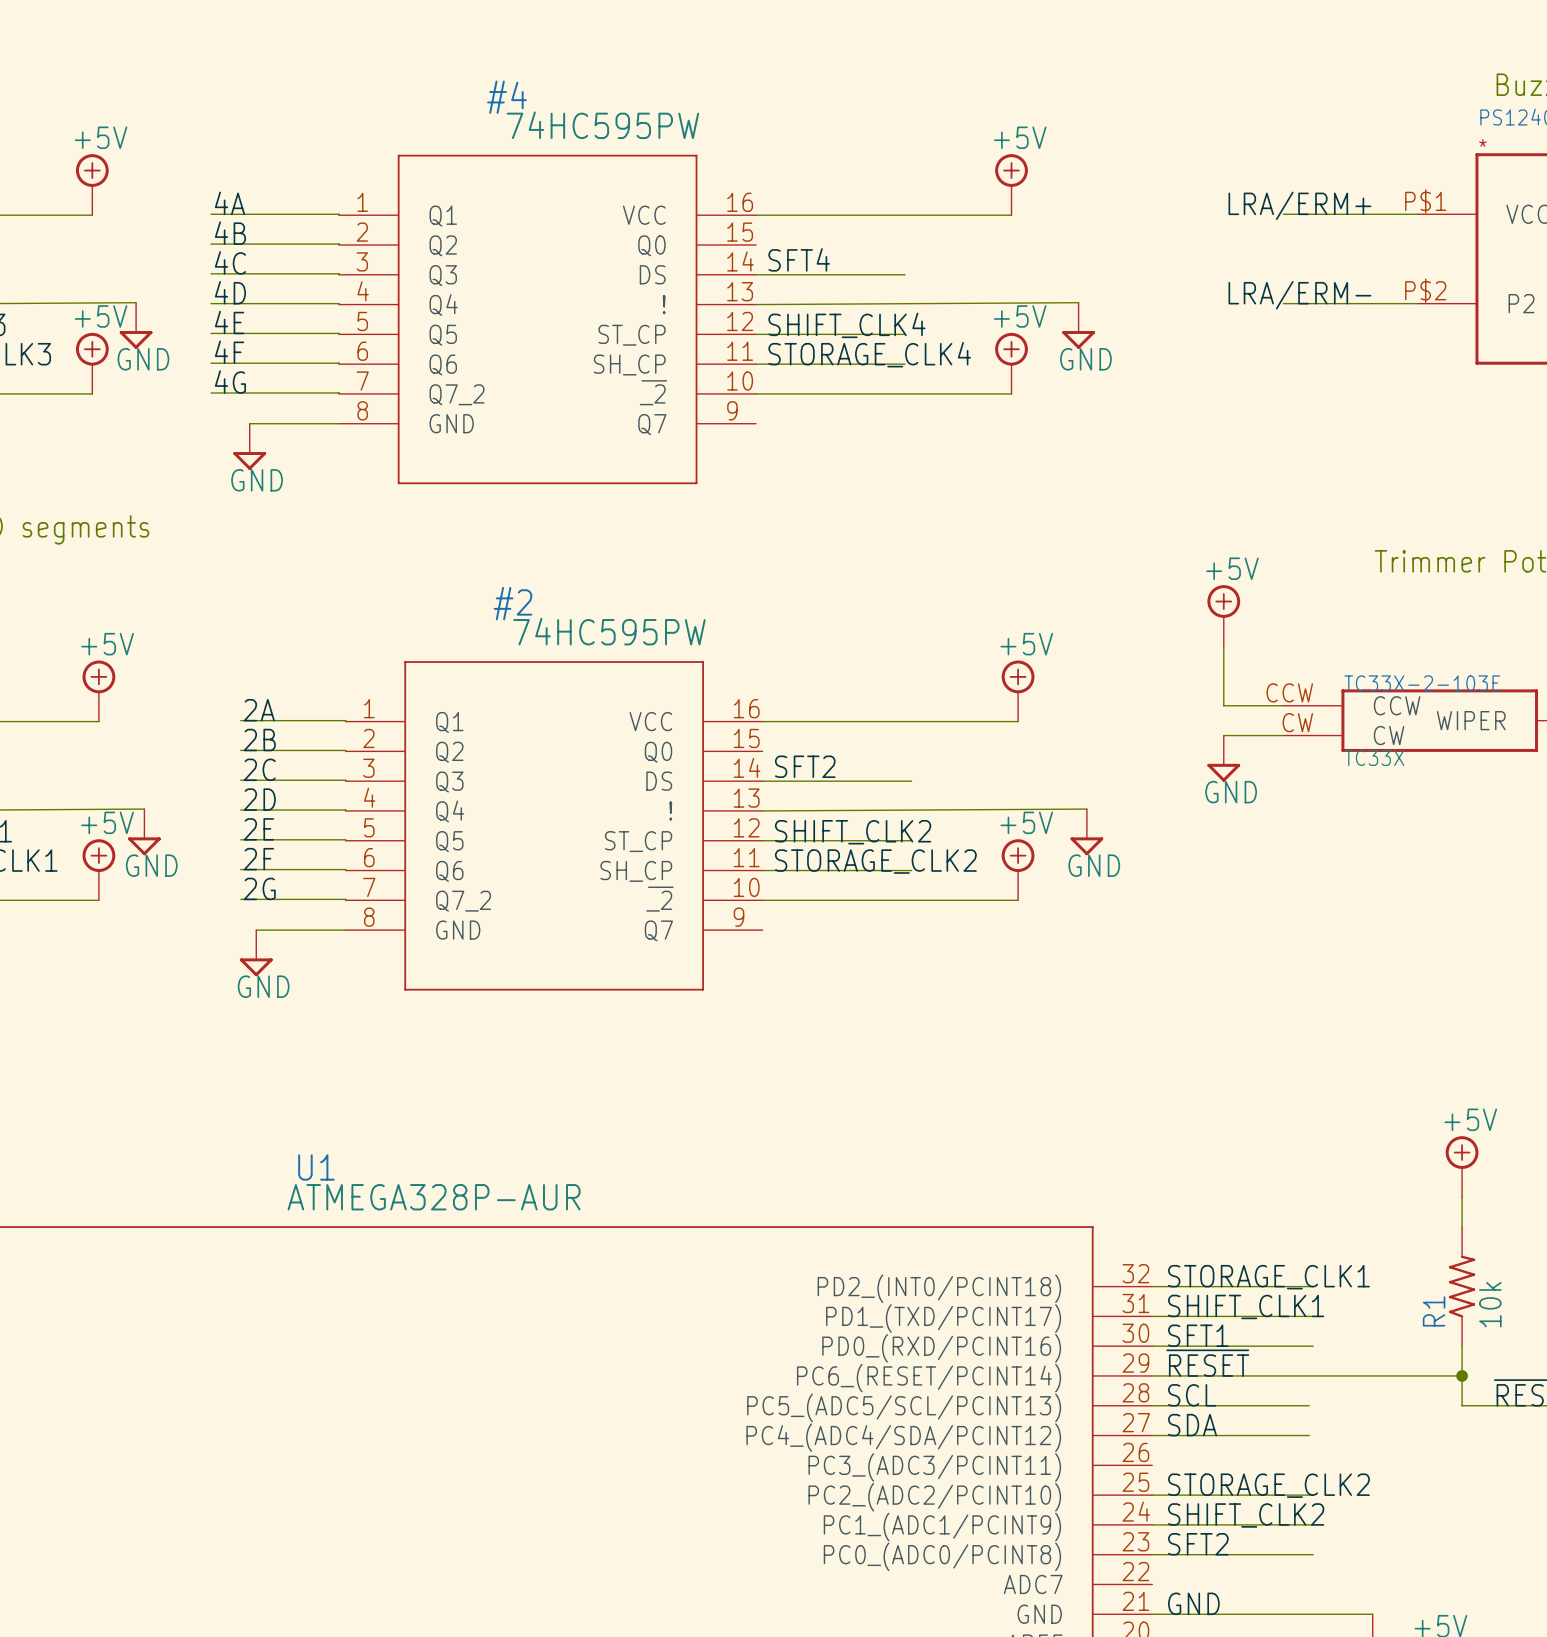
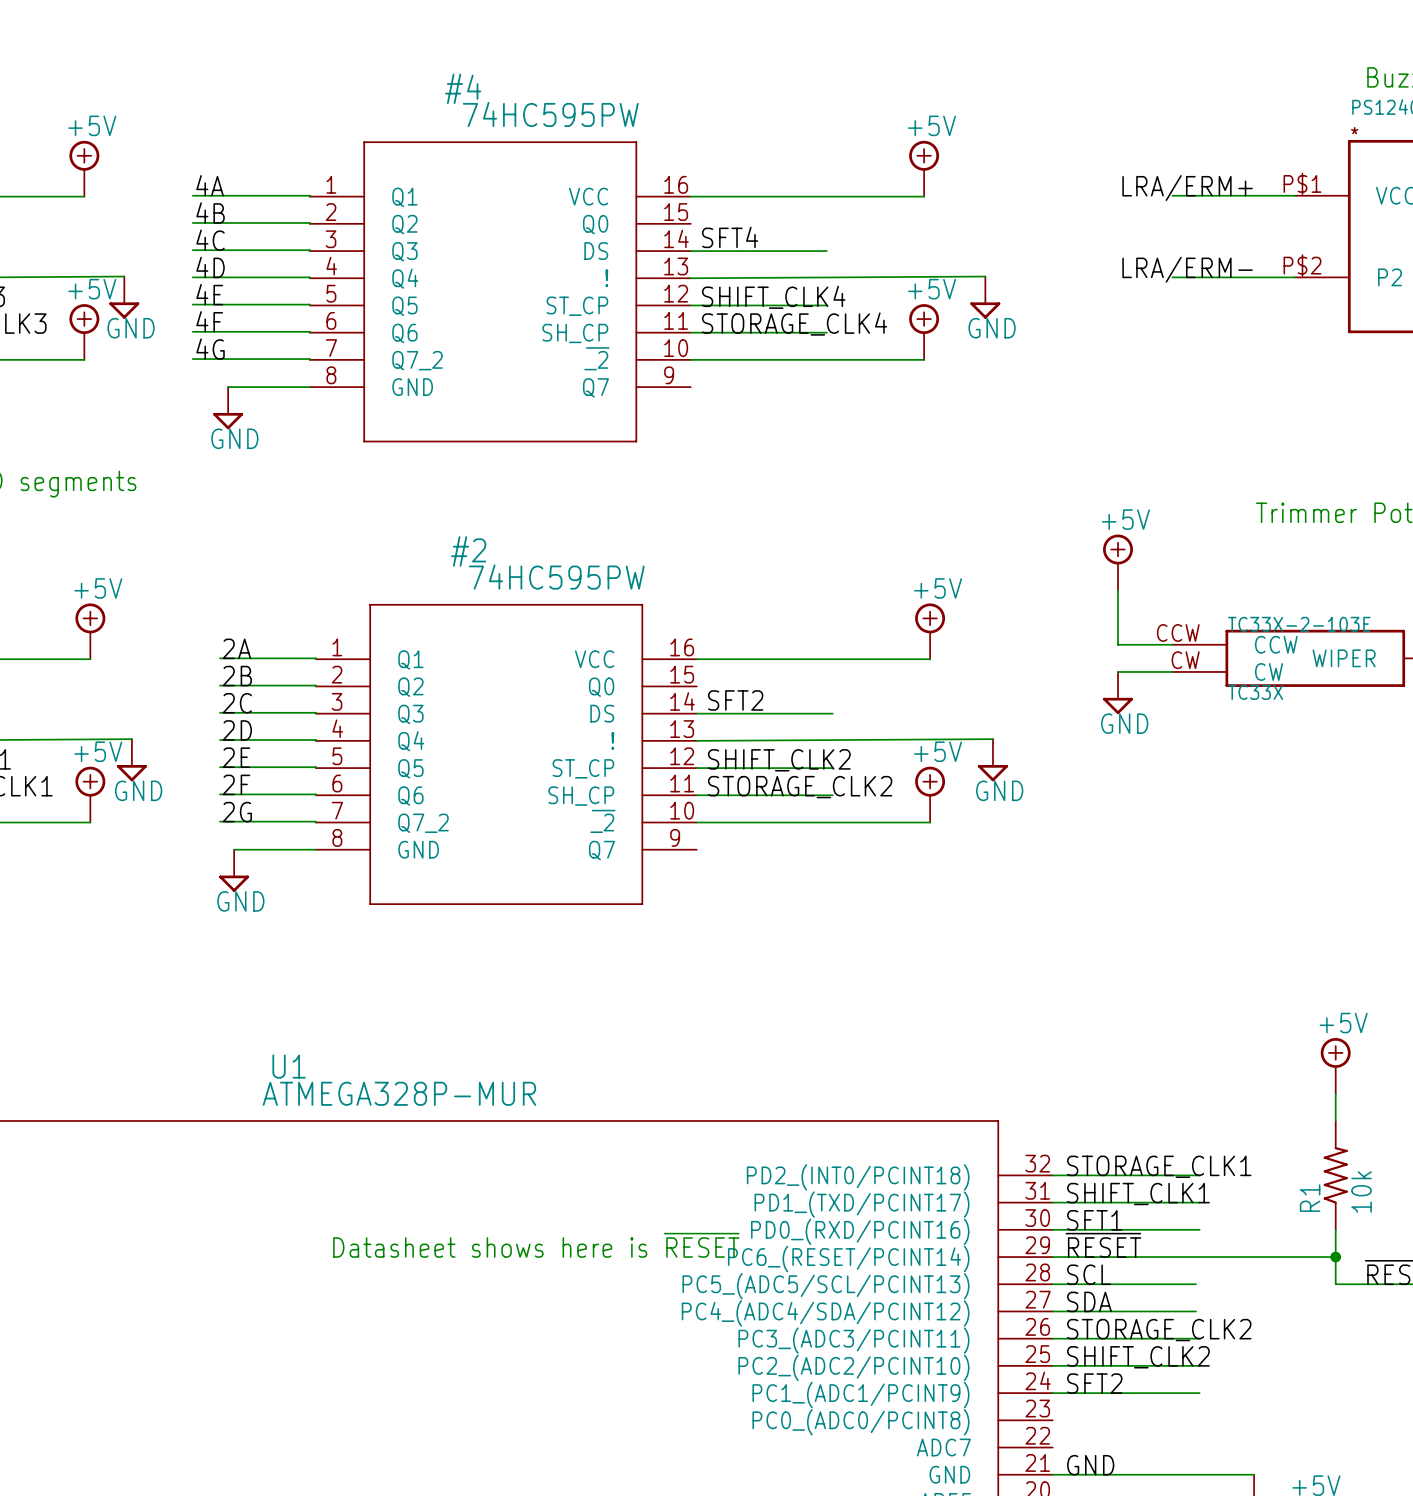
U1 value: ATMEGA328P-AUR (434, 1197) -> ATMEGA328P-MUR (399, 1093)
text: none -> Datasheet shows here is ~{RESET} (536, 1245)
label: none -> STORAGE_CLK2 (1159, 1330)
label: STORAGE_CLK2 (1268, 1485) -> SHIFT_CLK2 (1138, 1357)
label: SHIFT_CLK2 (1246, 1515) -> SFT2 (1094, 1383)
label: SFT2 (1198, 1544) -> none
wire: (1152, 1554) (1313, 1554) -> (1052, 1338) (1199, 1338)

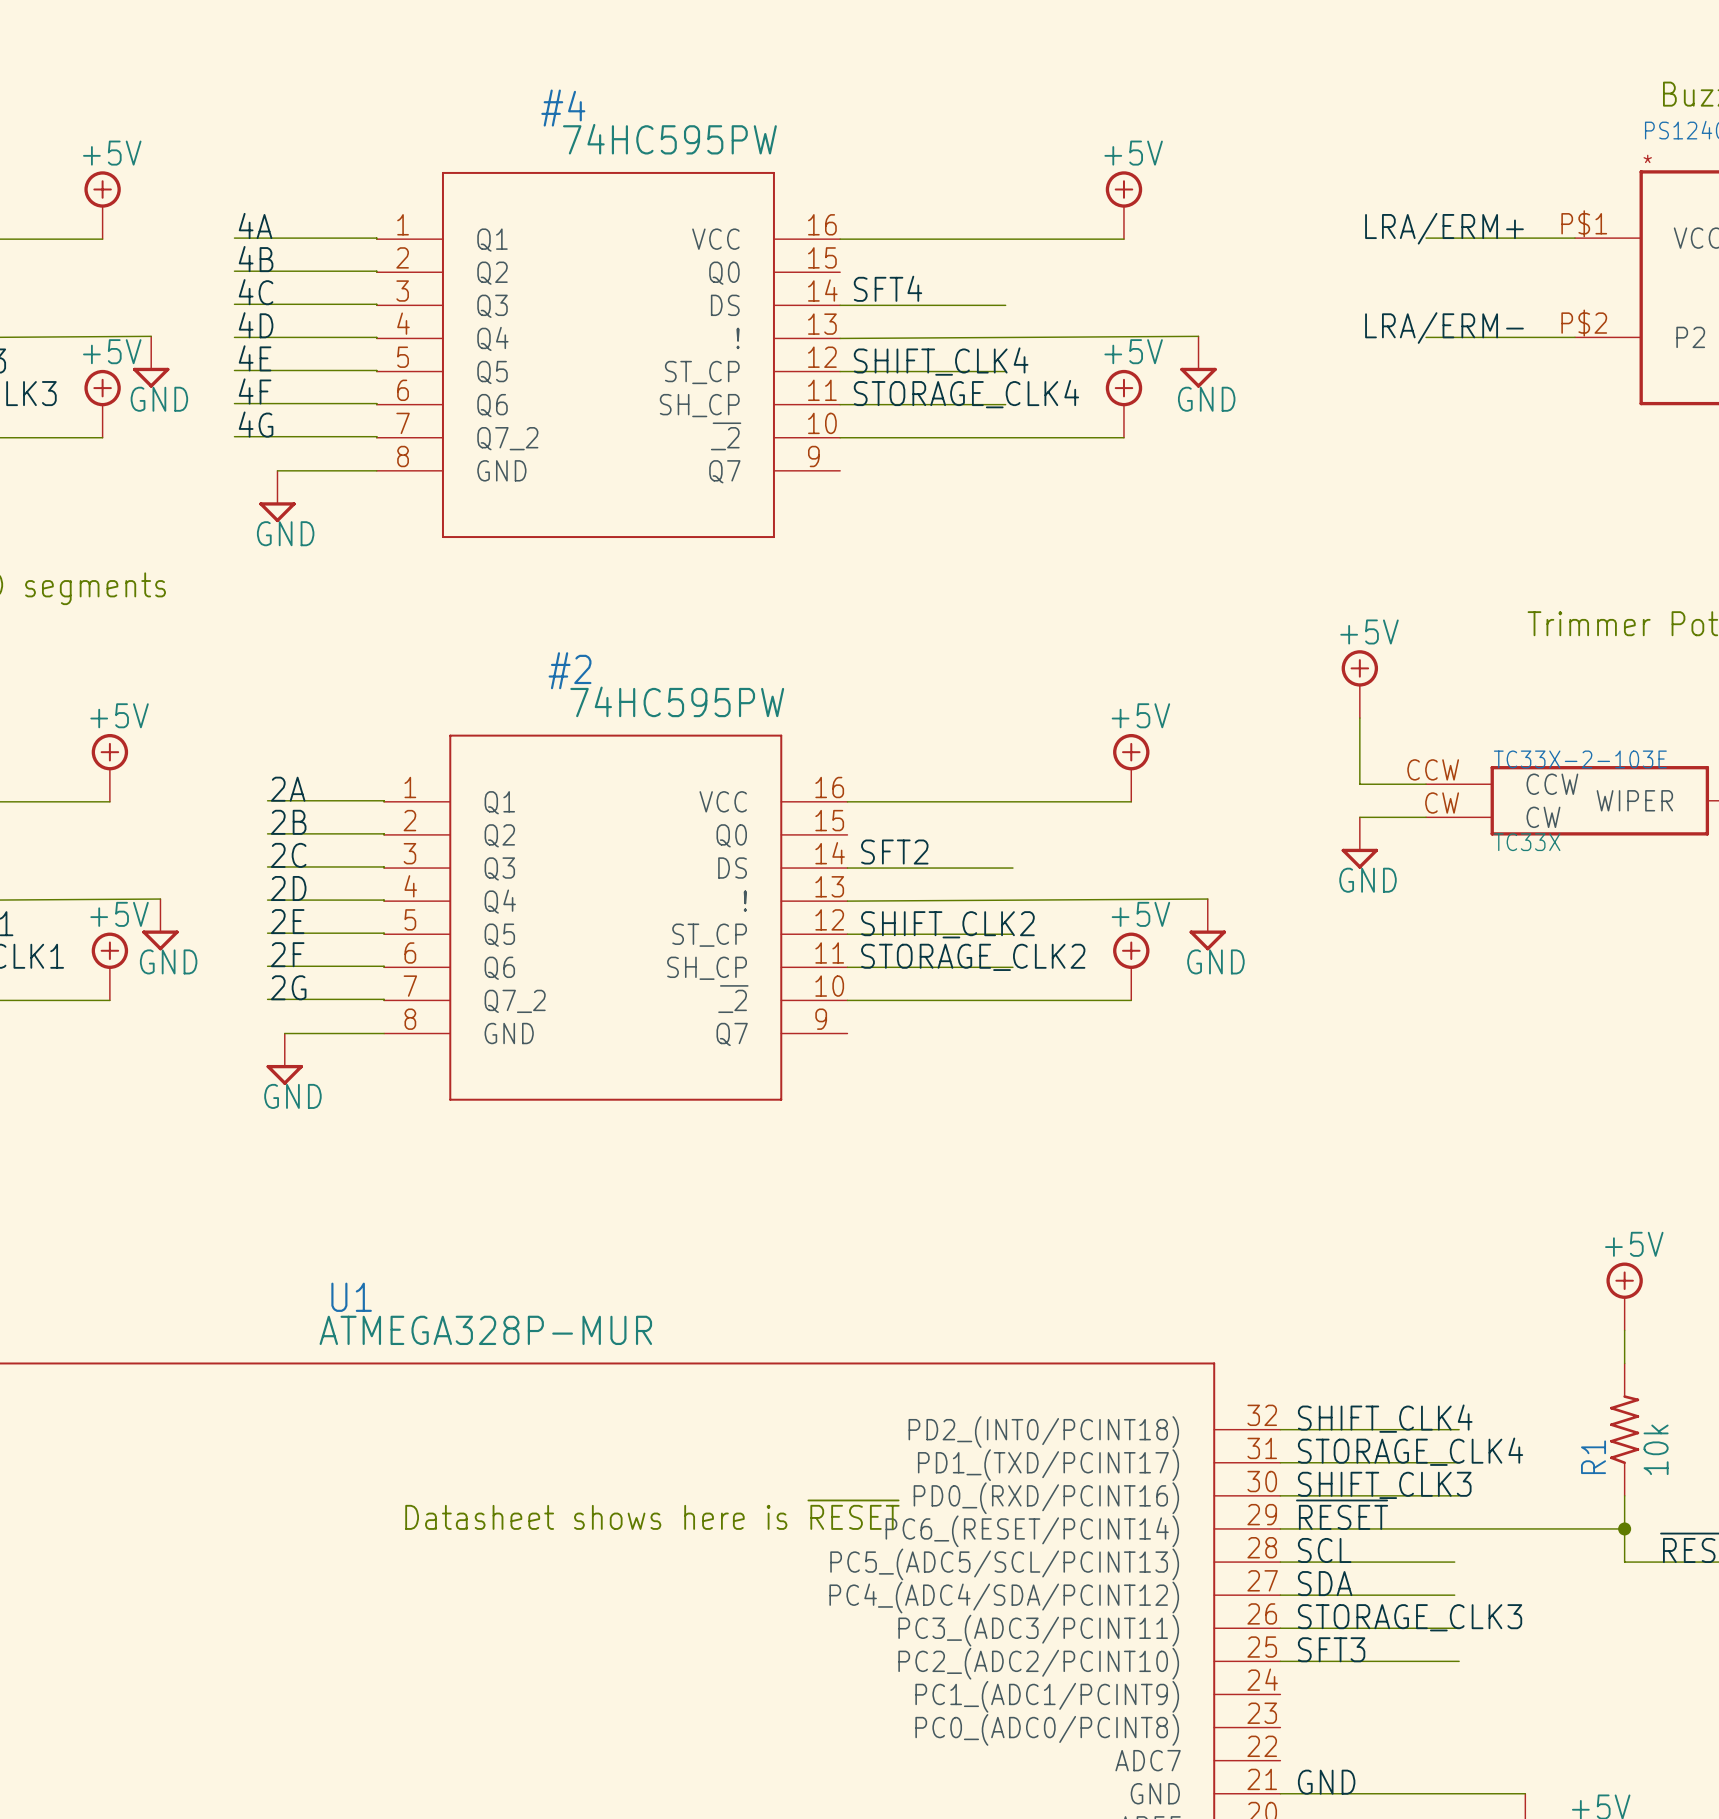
label: STORAGE_CLK1 (1159, 1166) -> SHIFT_CLK4 (1385, 1418)
label: SHIFT_CLK1 (1138, 1194) -> STORAGE_CLK4 (1410, 1451)
label: SFT1 (1094, 1220) -> SHIFT_CLK3 (1384, 1485)
label: STORAGE_CLK2 (1159, 1330) -> STORAGE_CLK3 (1410, 1617)
label: SHIFT_CLK2 (1138, 1357) -> SFT3 (1331, 1649)
label: SFT2 (1094, 1383) -> none
wire: (1052, 1393) (1199, 1393) -> none

